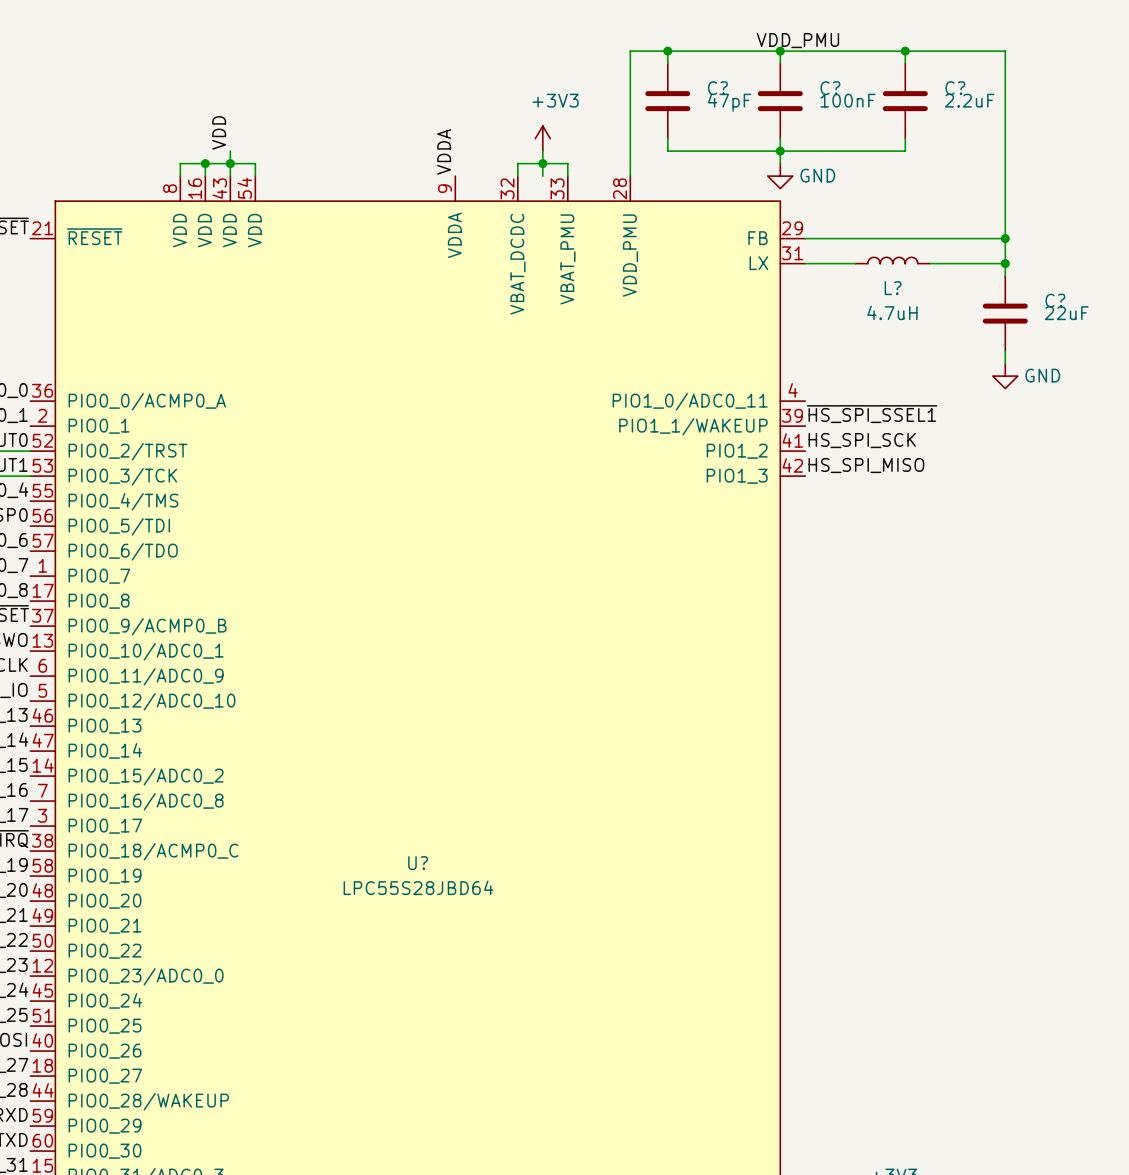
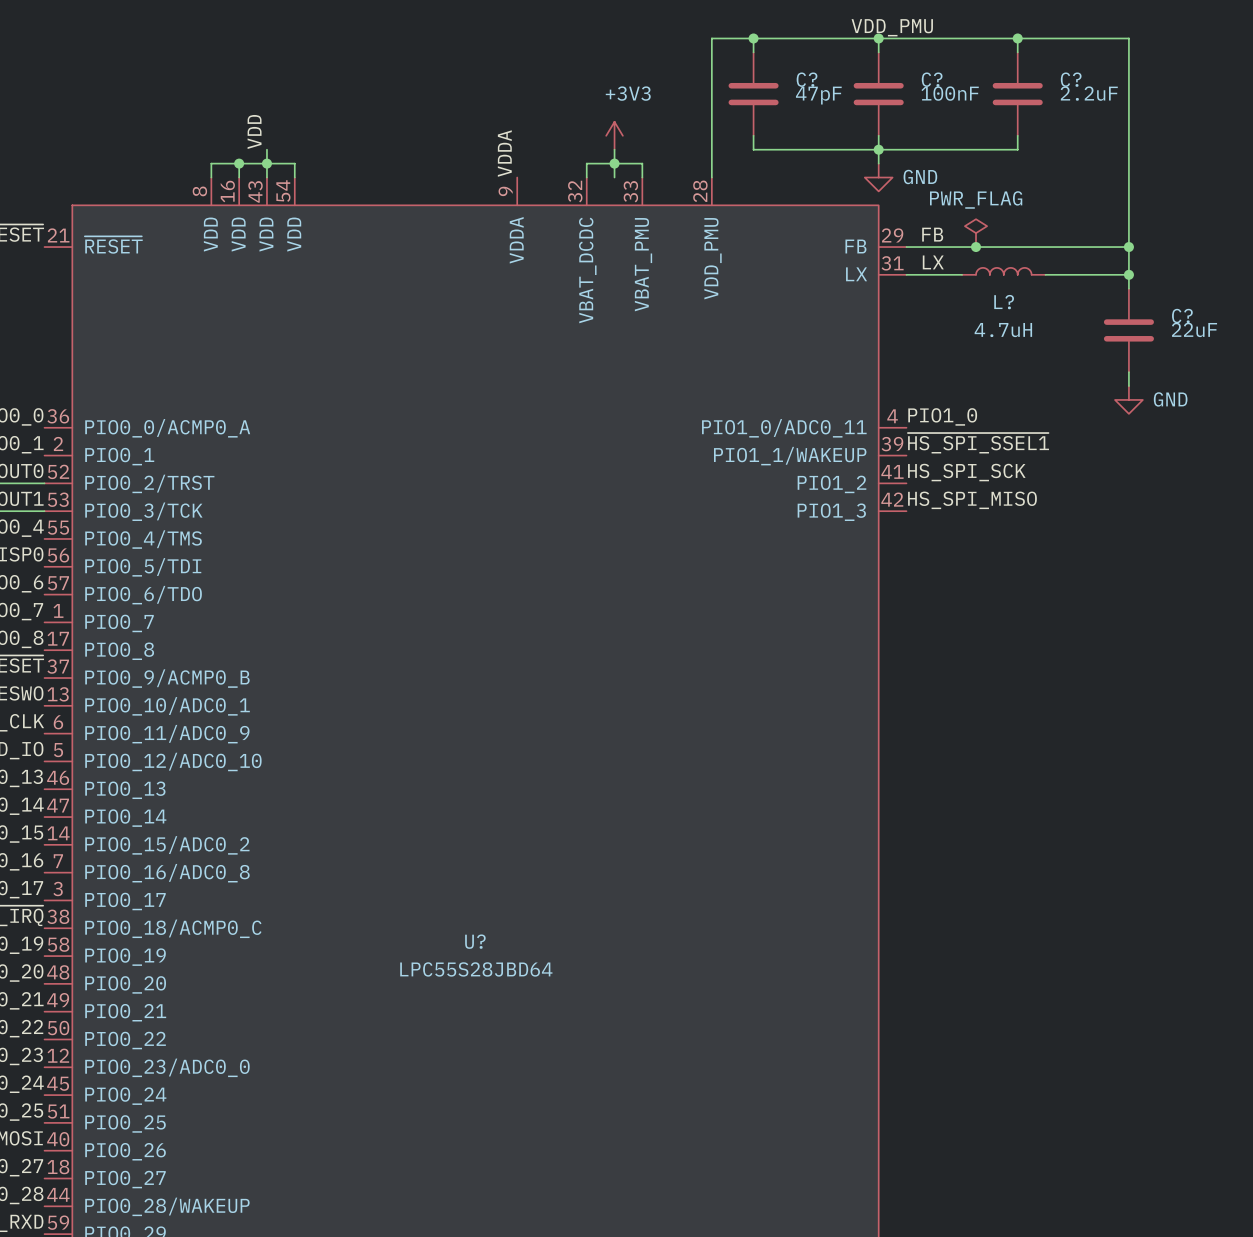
power symbol: none -> PWR_FLAG (976, 233)
label: none -> FB (932, 234)
junction: none -> (976, 247)
label: none -> LX (933, 262)
label: none -> PIO1_0 (942, 416)

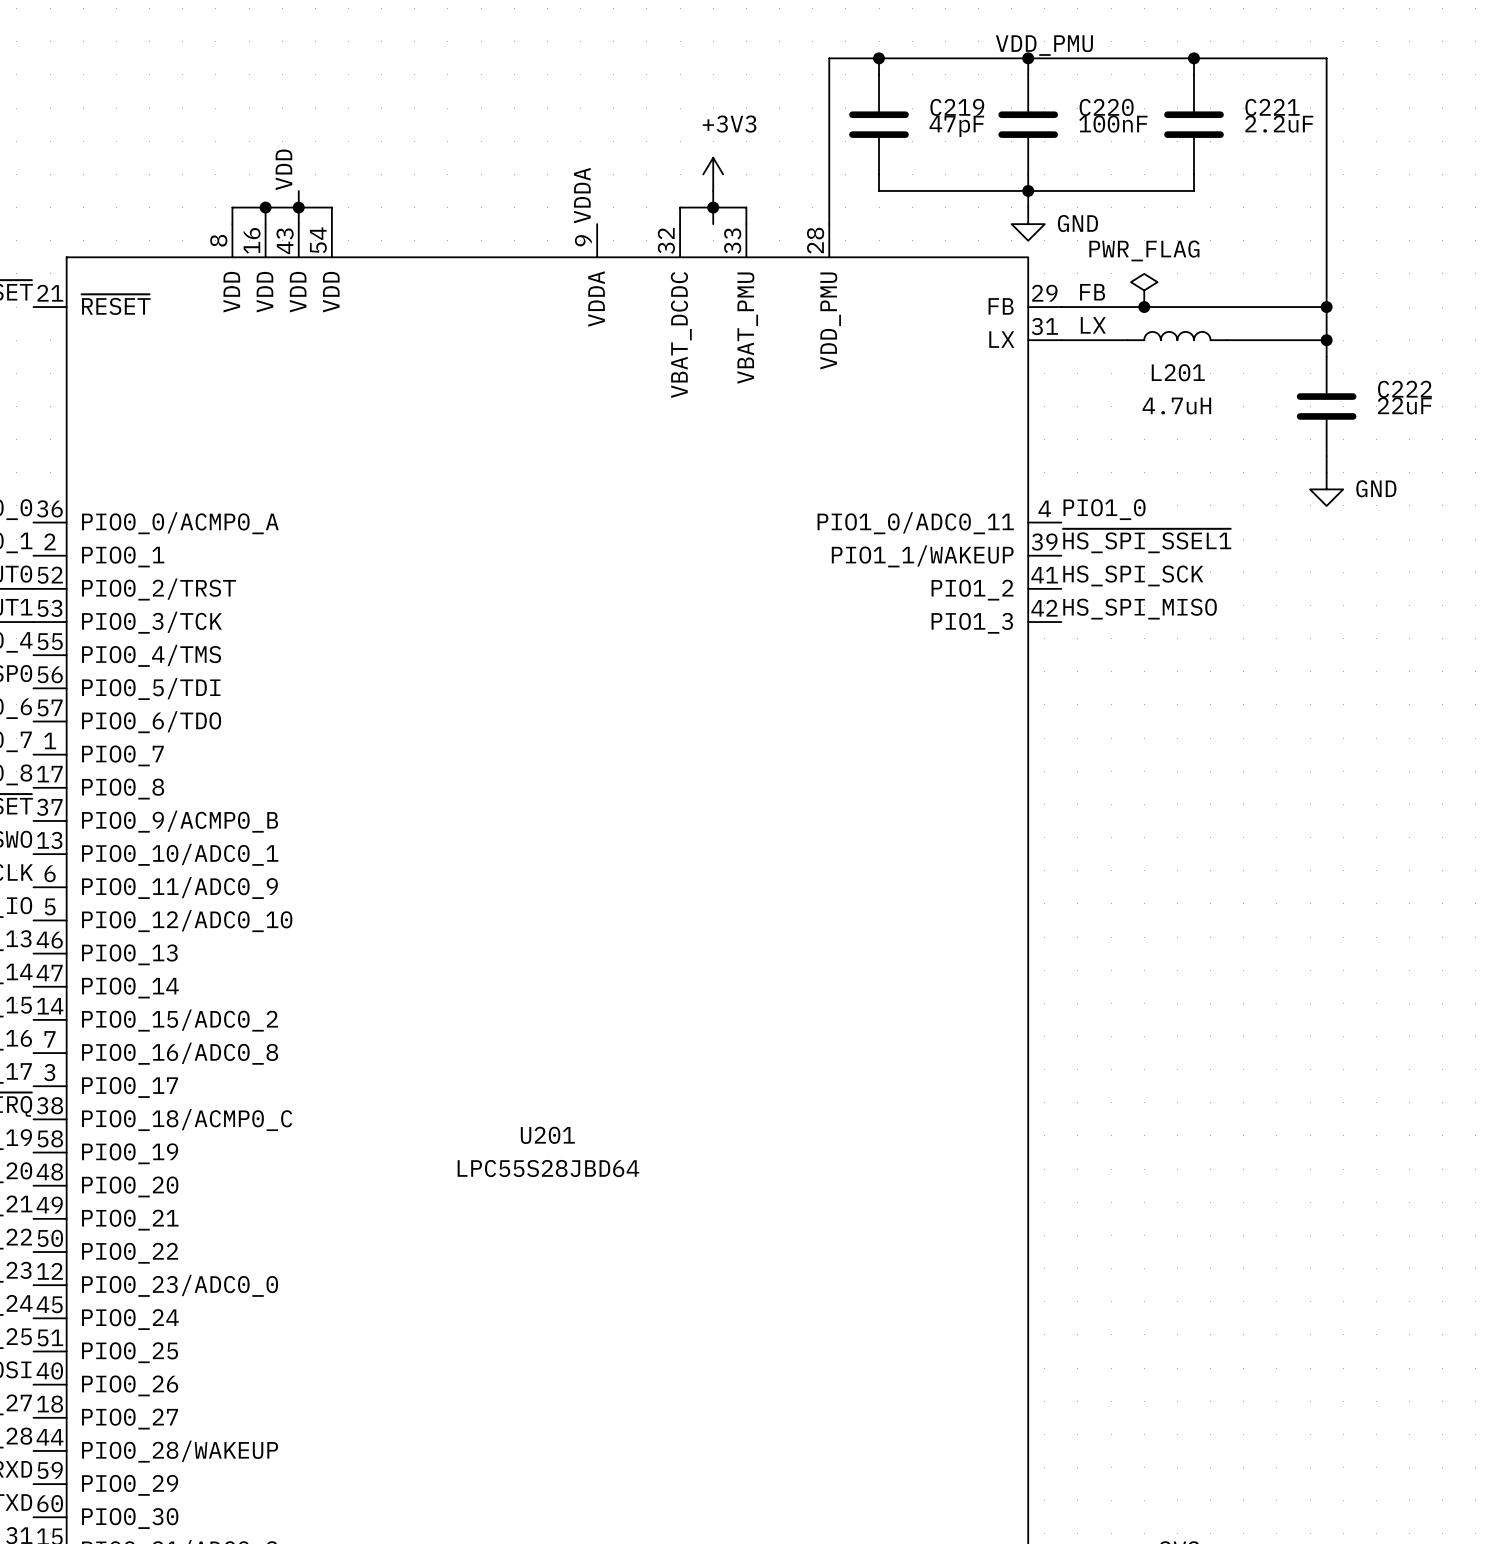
C? name: C? (807, 79) -> C219 (957, 107)
C? name: C? (932, 79) -> C220 (1106, 107)
C? name: C? (1071, 79) -> C221 (1272, 107)
L? name: L? (1004, 302) -> L201 (1178, 372)
C? name: C? (1182, 316) -> C222 (1404, 389)
U? name: U? (475, 941) -> U201 (547, 1135)

